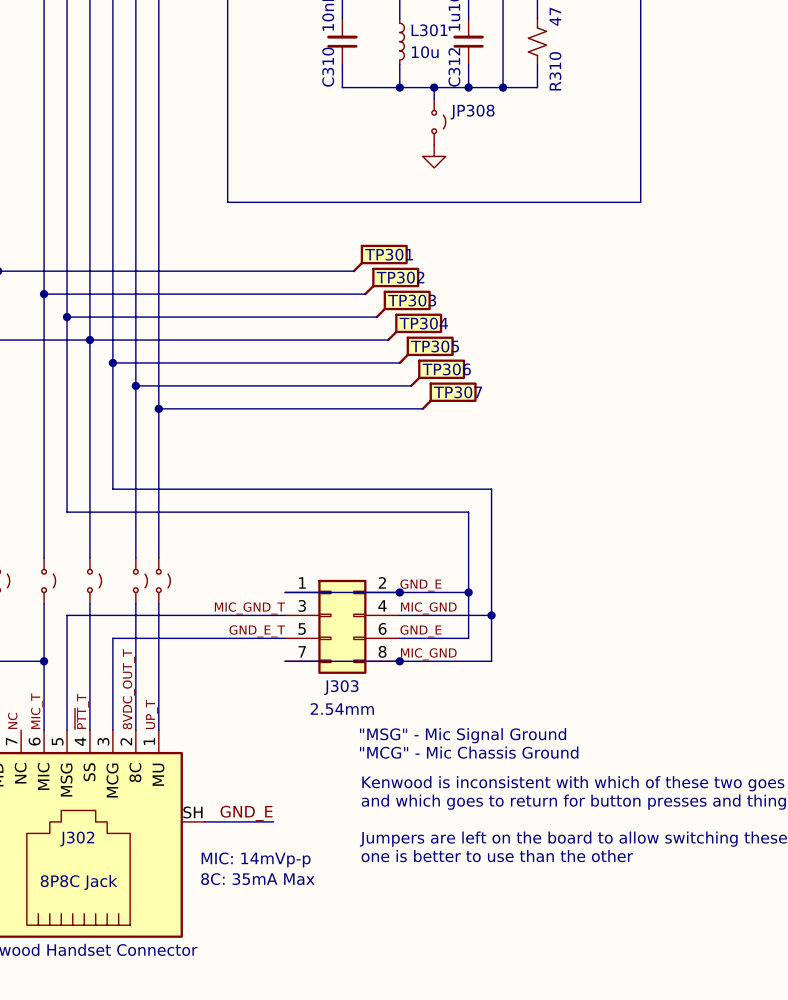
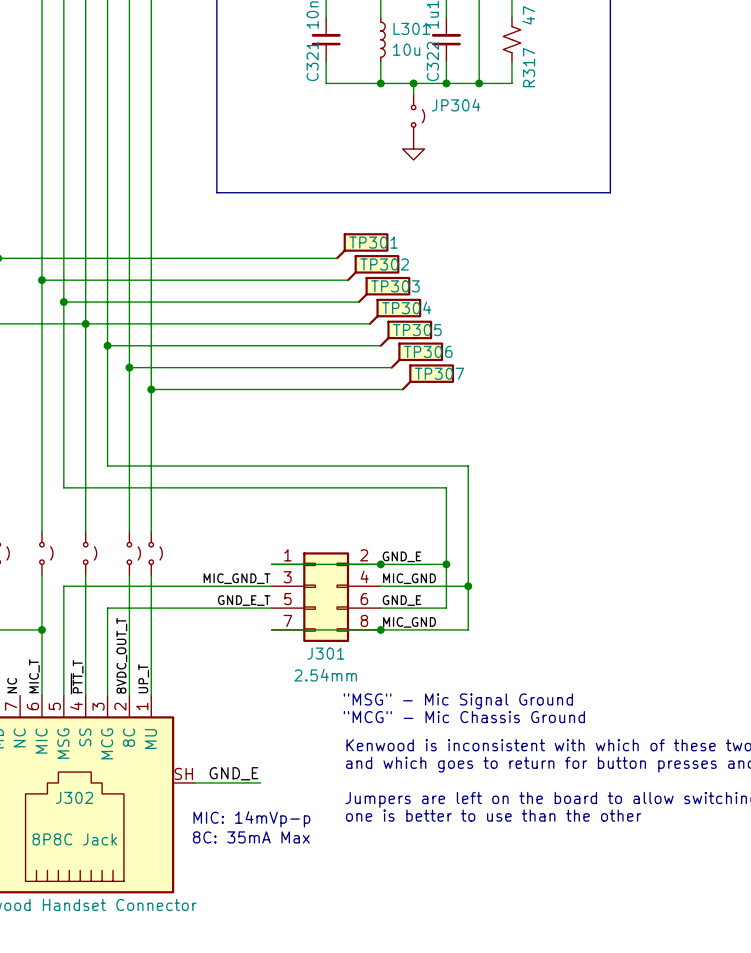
C310 name: C310 (328, 67) -> C321 (312, 61)
C312 name: C312 (454, 67) -> C322 (432, 61)
R310 name: R310 (555, 71) -> R317 (529, 67)
JP308 name: JP308 (472, 112) -> JP304 (456, 105)
J303 name: J303 (341, 687) -> J301 (325, 653)

